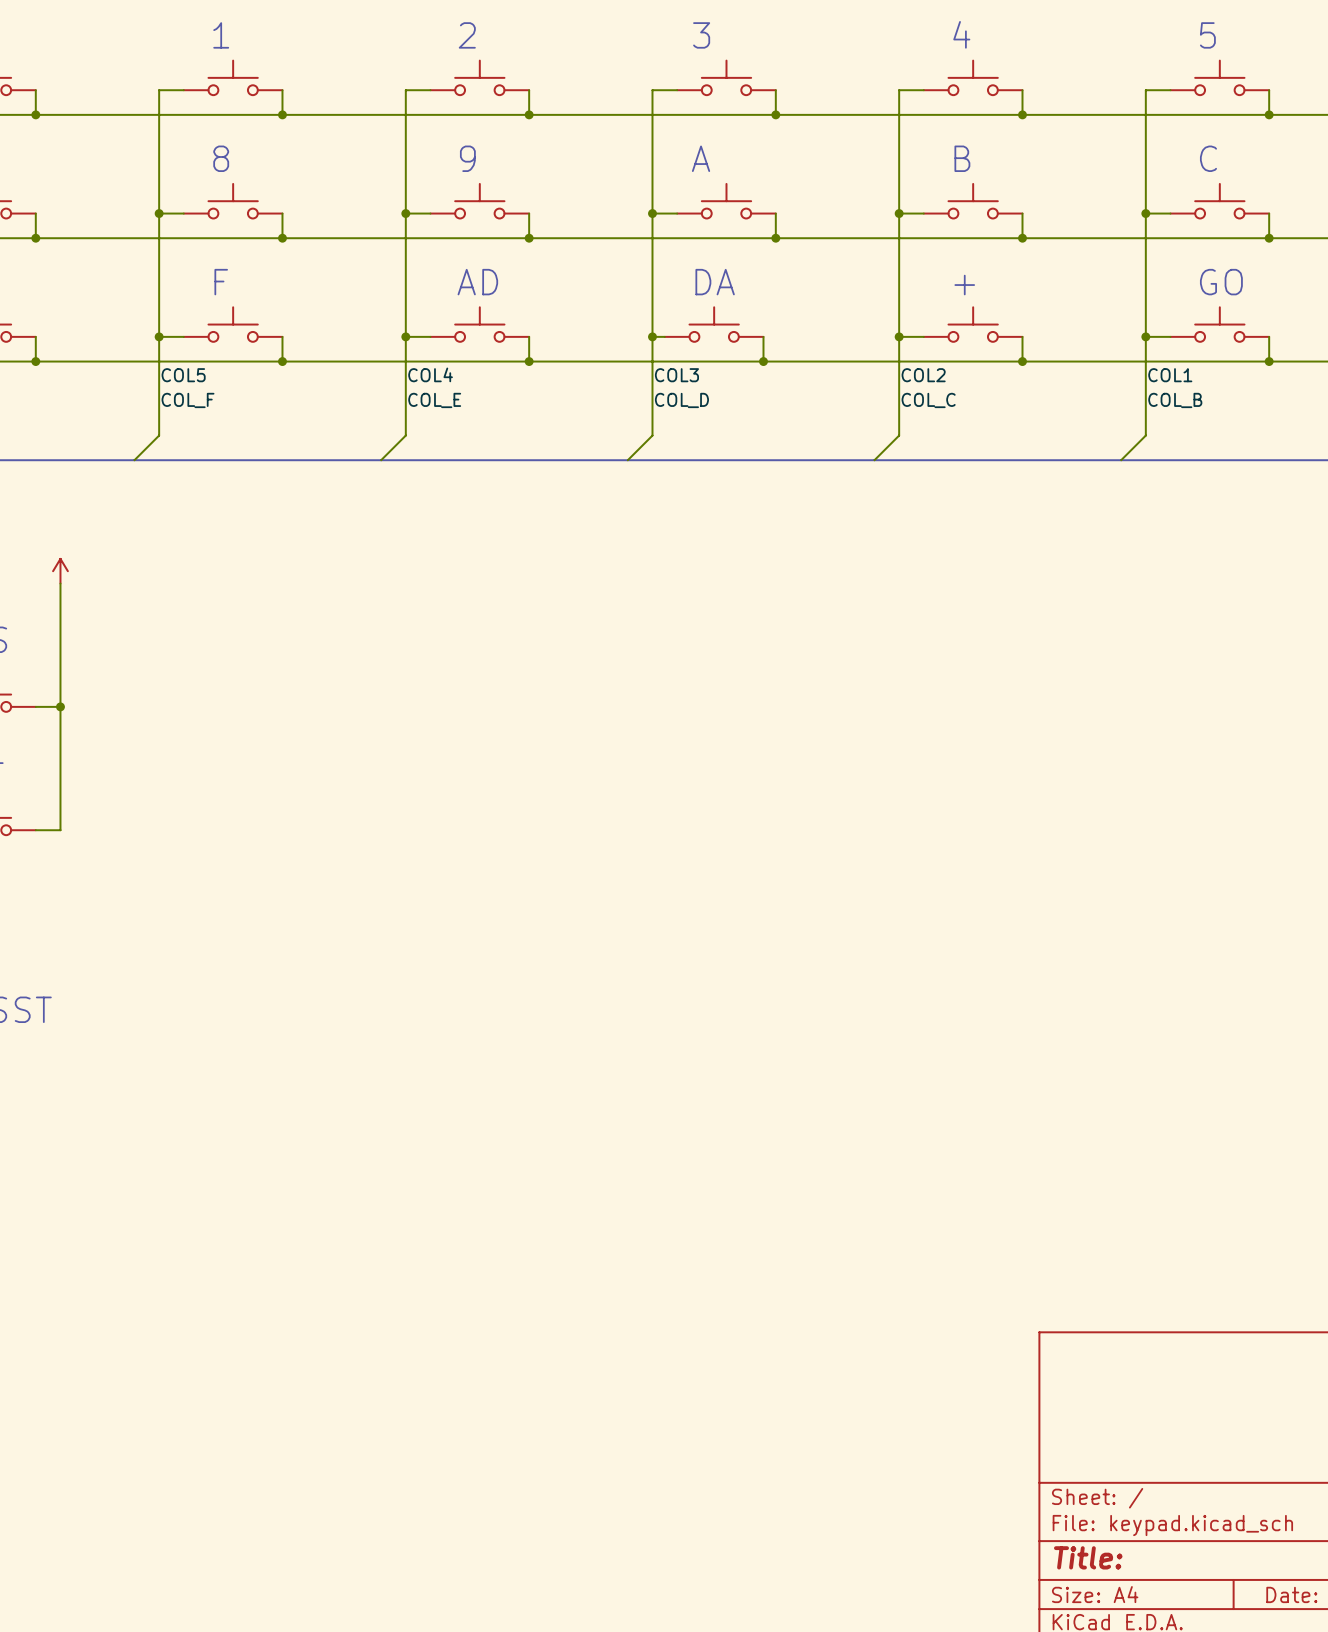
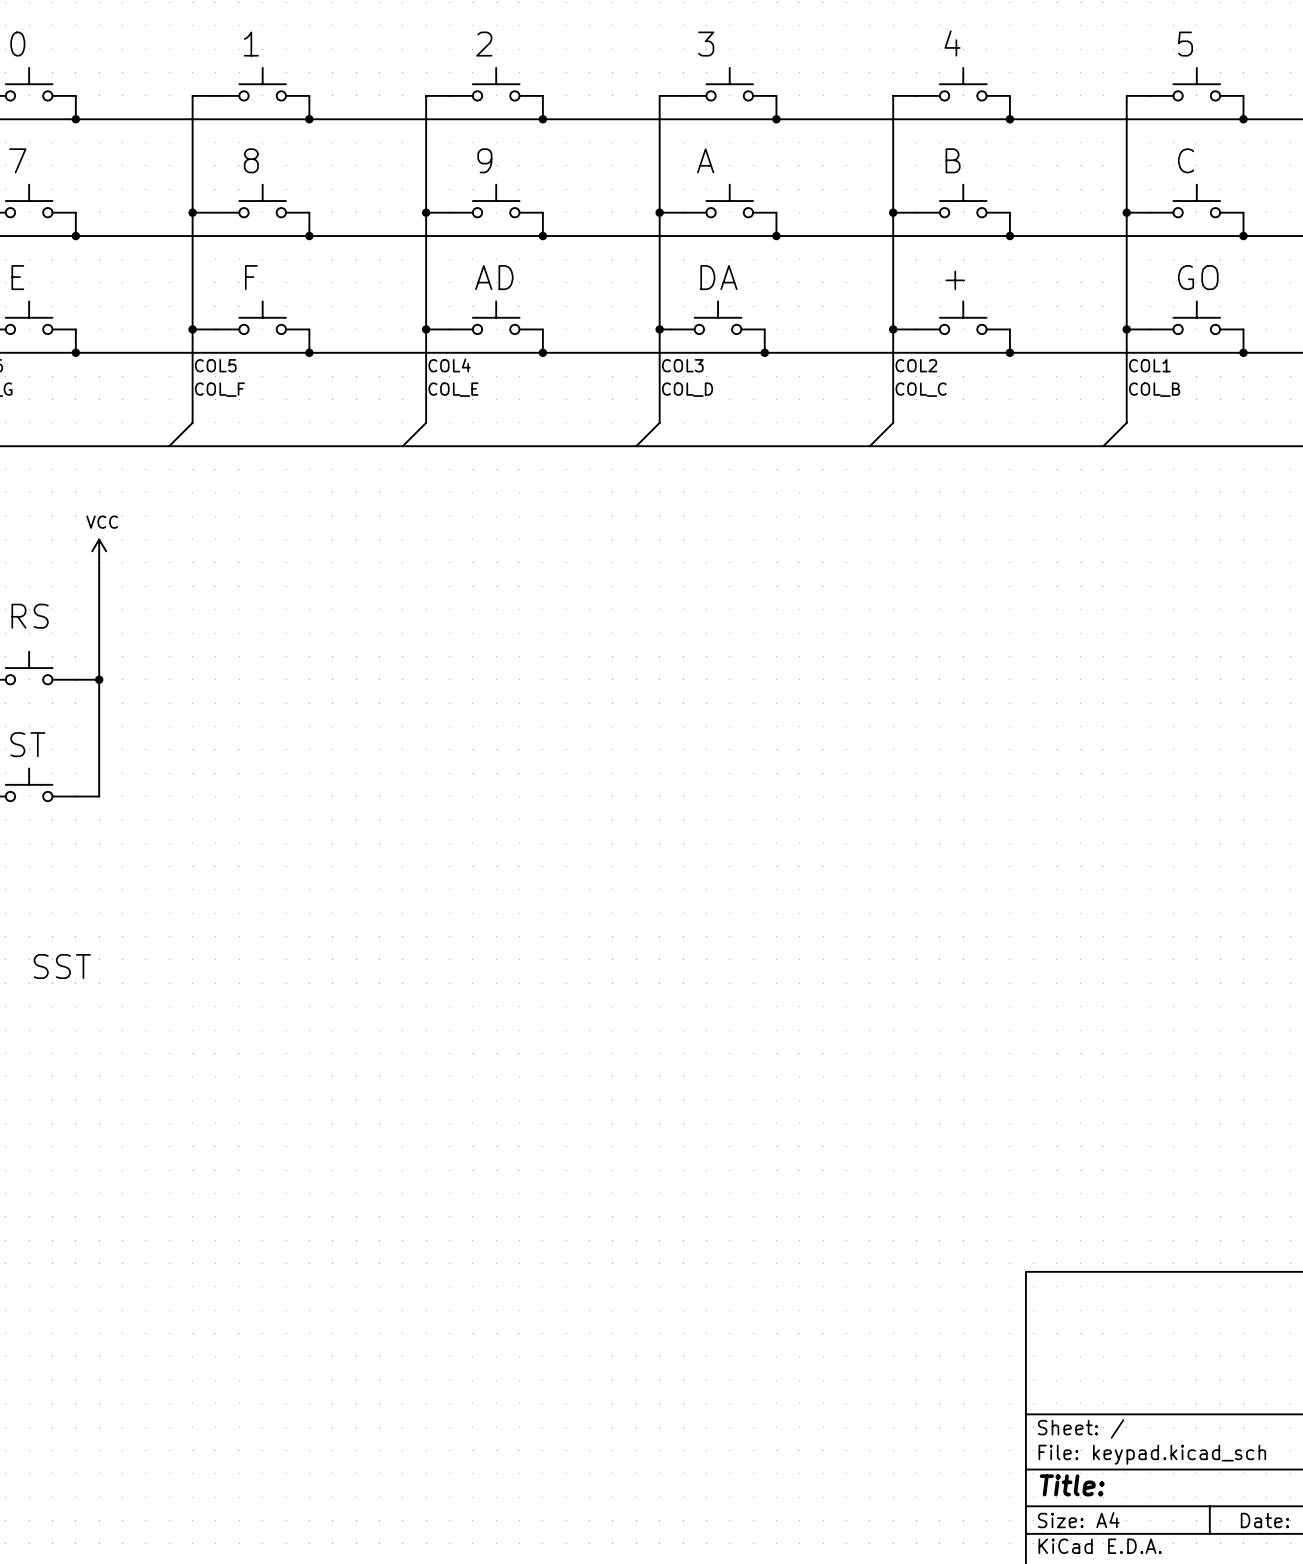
power symbol text: none -> VCC (102, 522)

